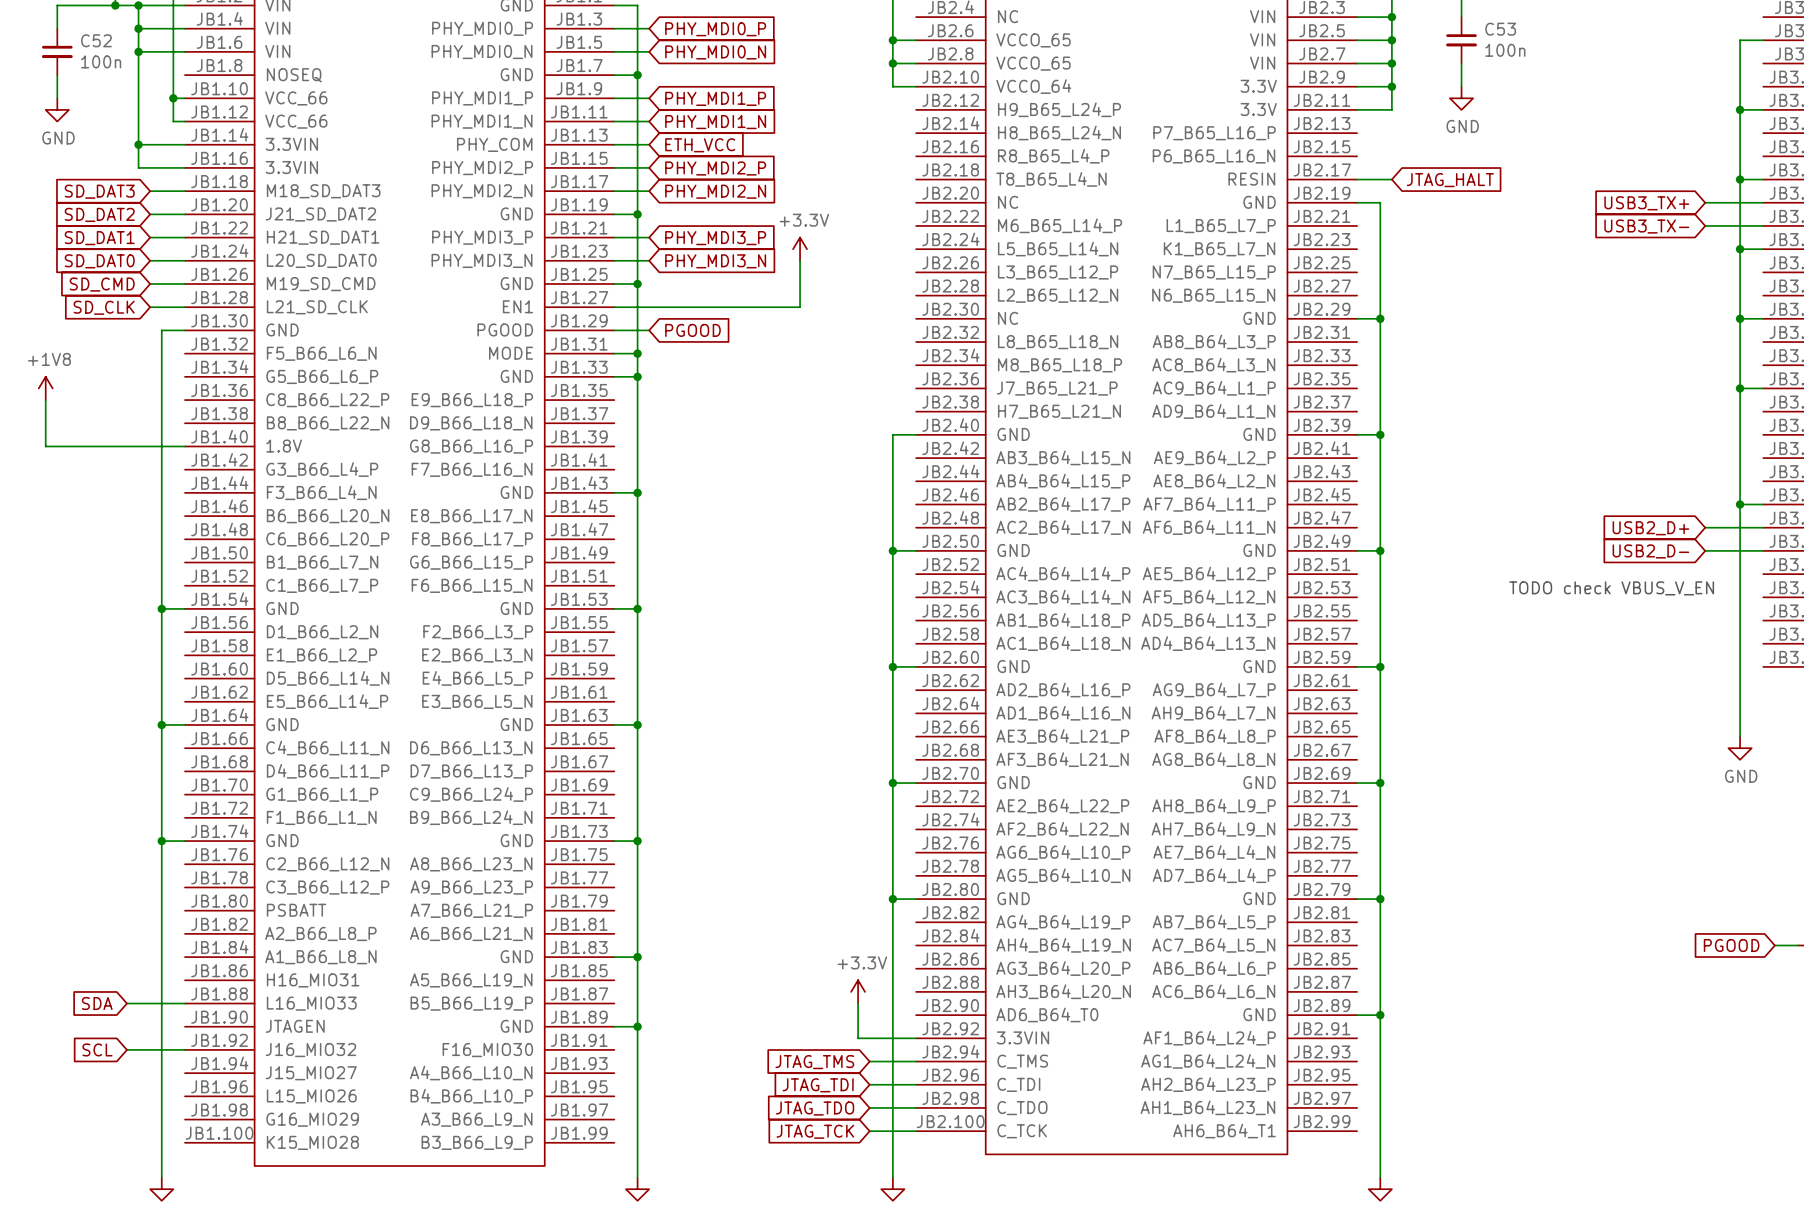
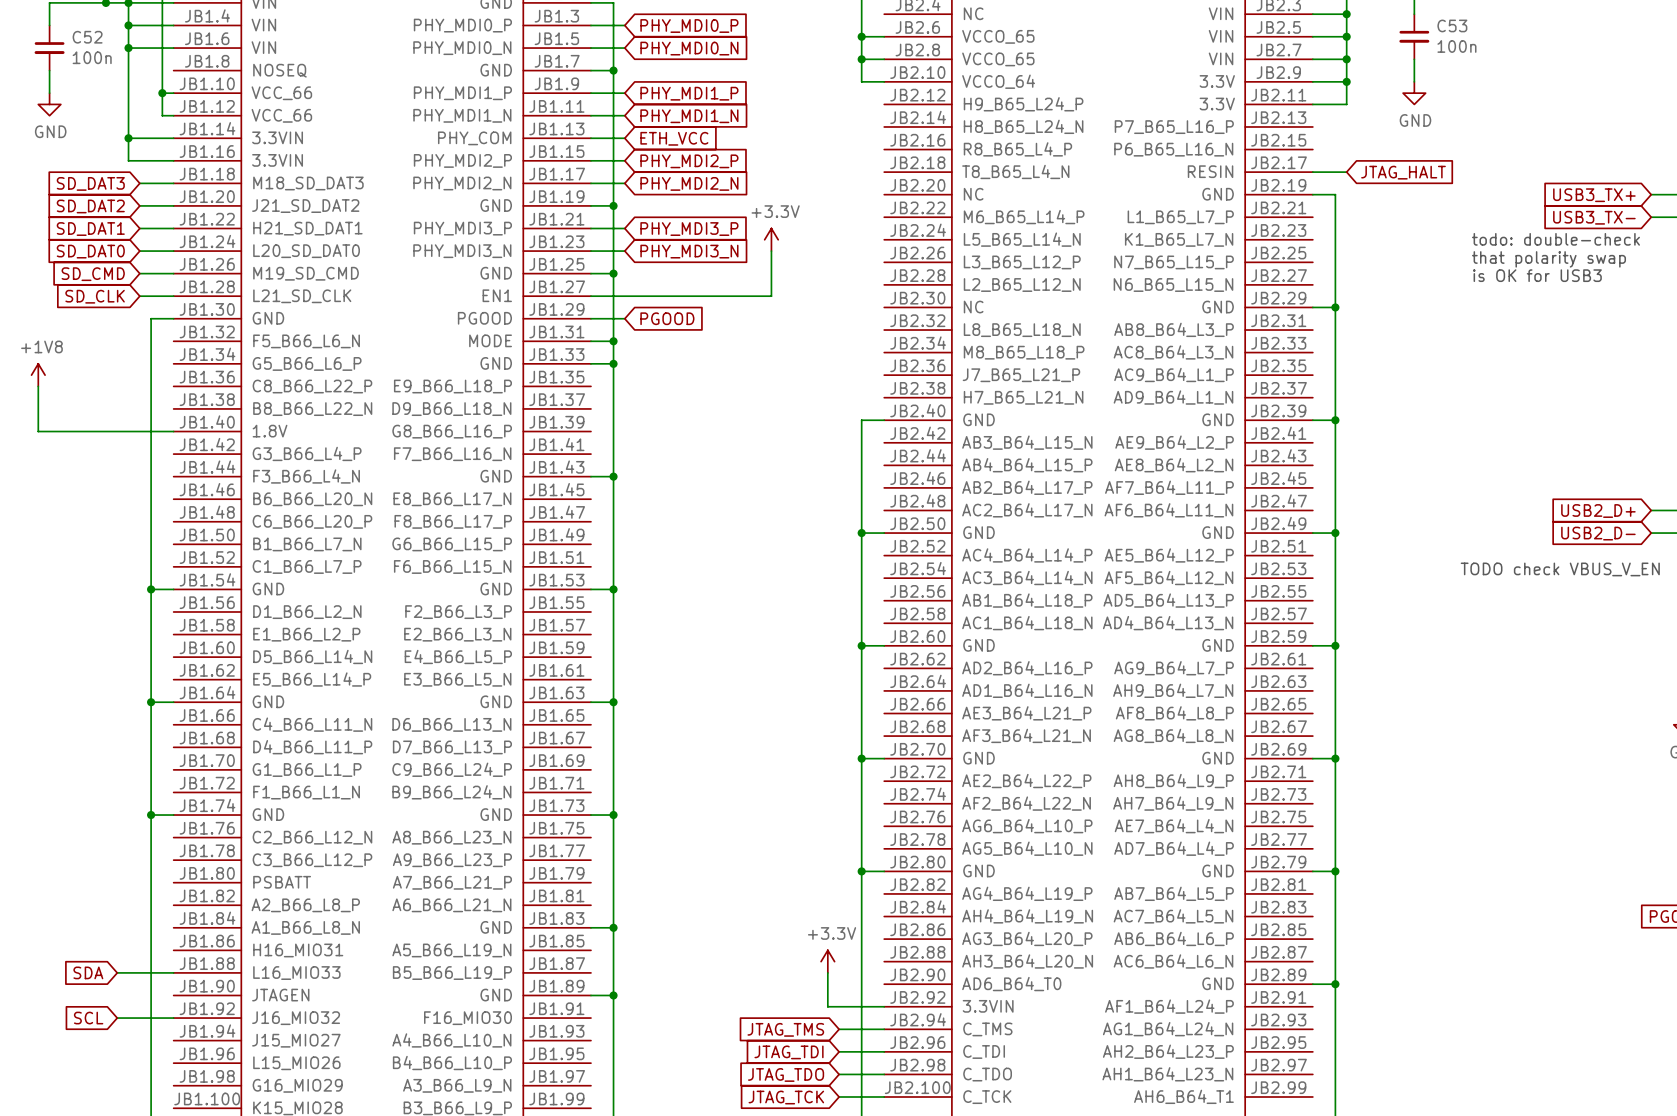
text: none -> todo: double-check (1555, 239)
text: none -> that polarity swap (1548, 259)
text: none -> is OK for USB3 (1537, 275)

